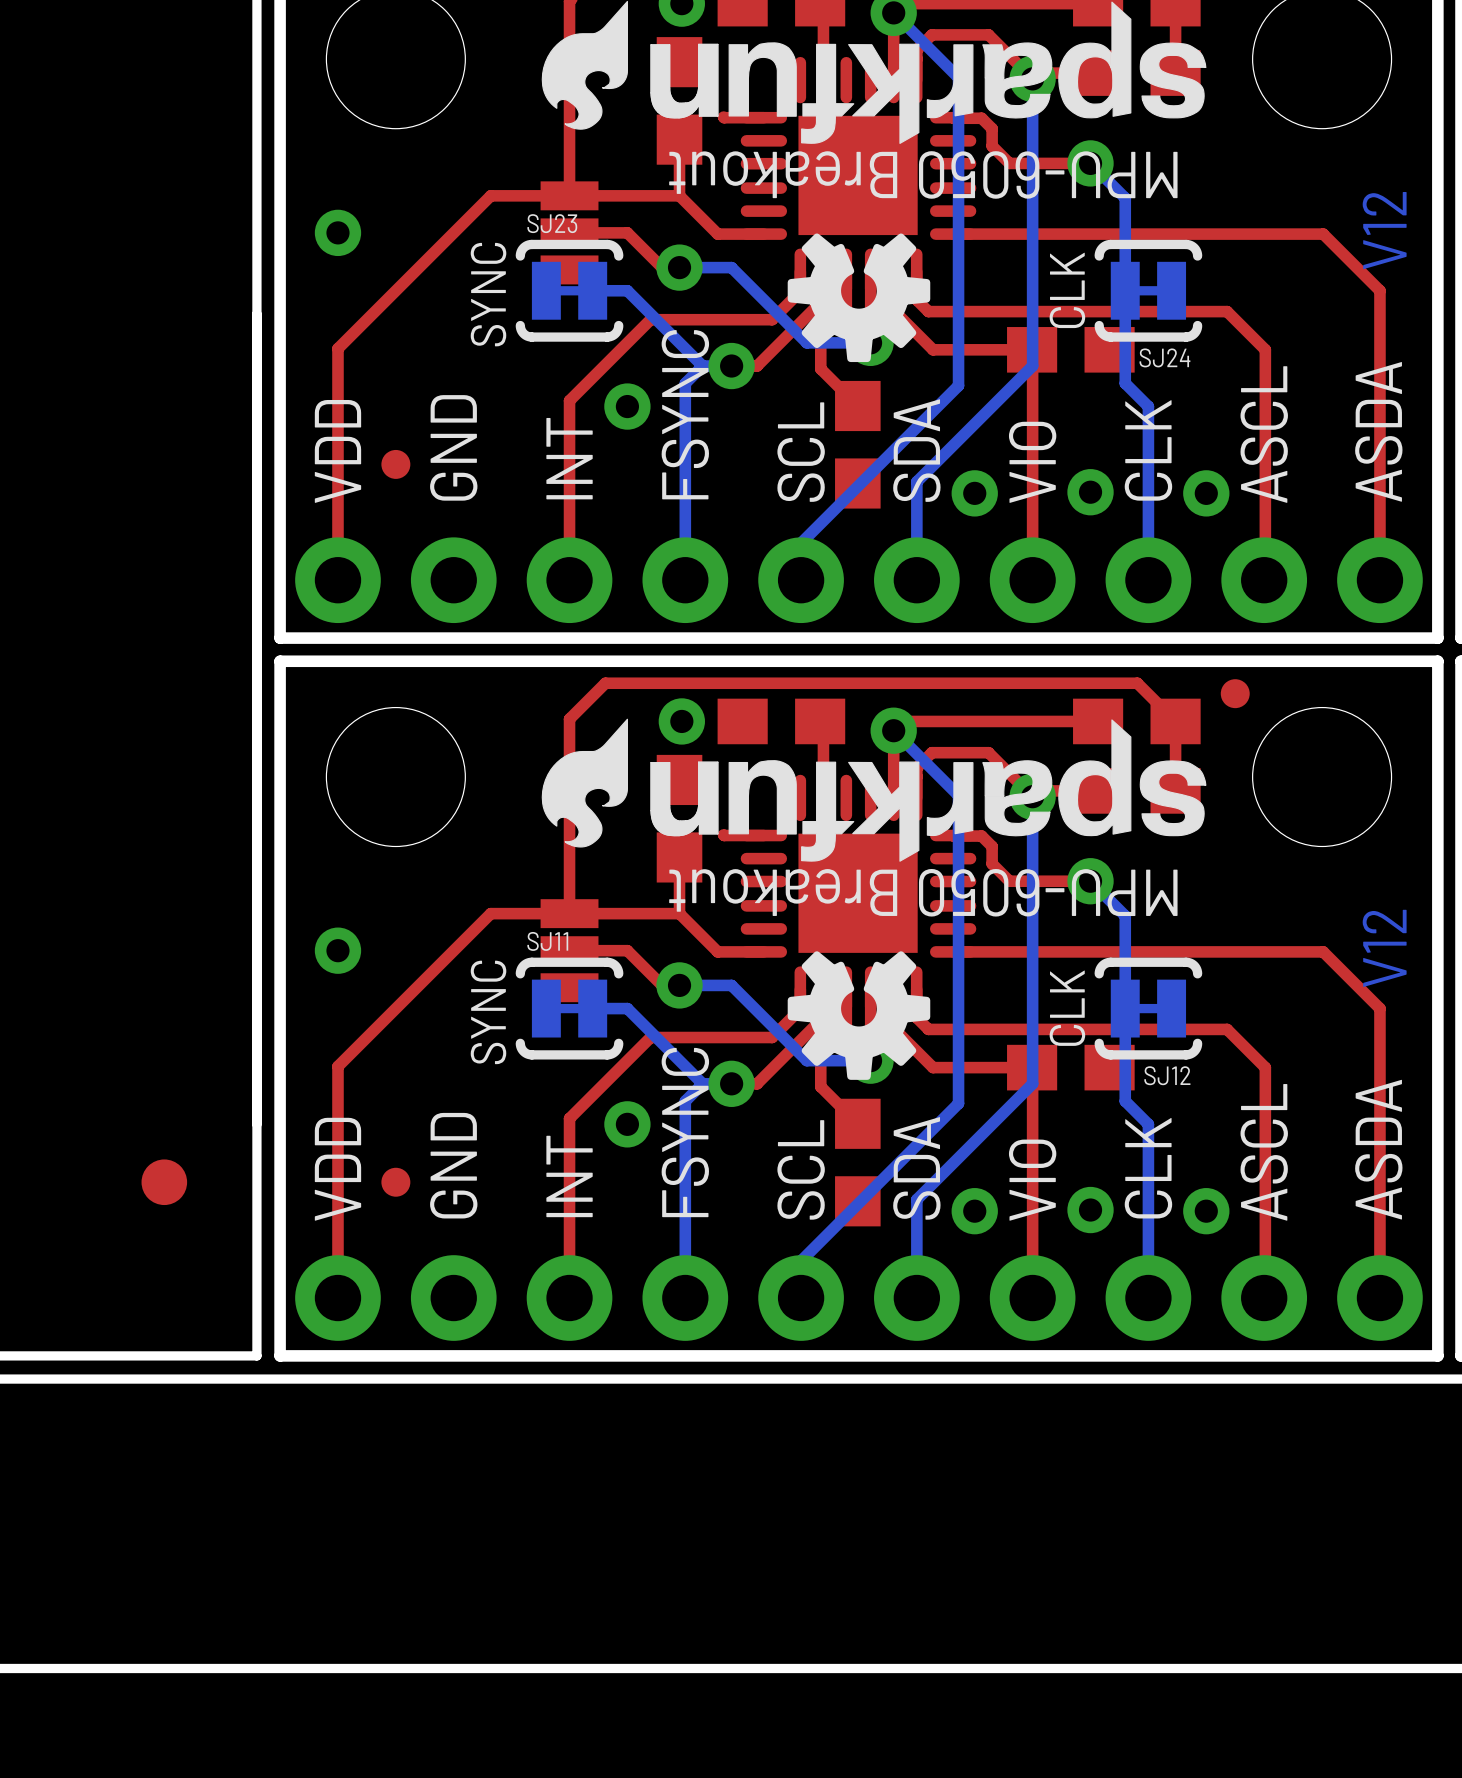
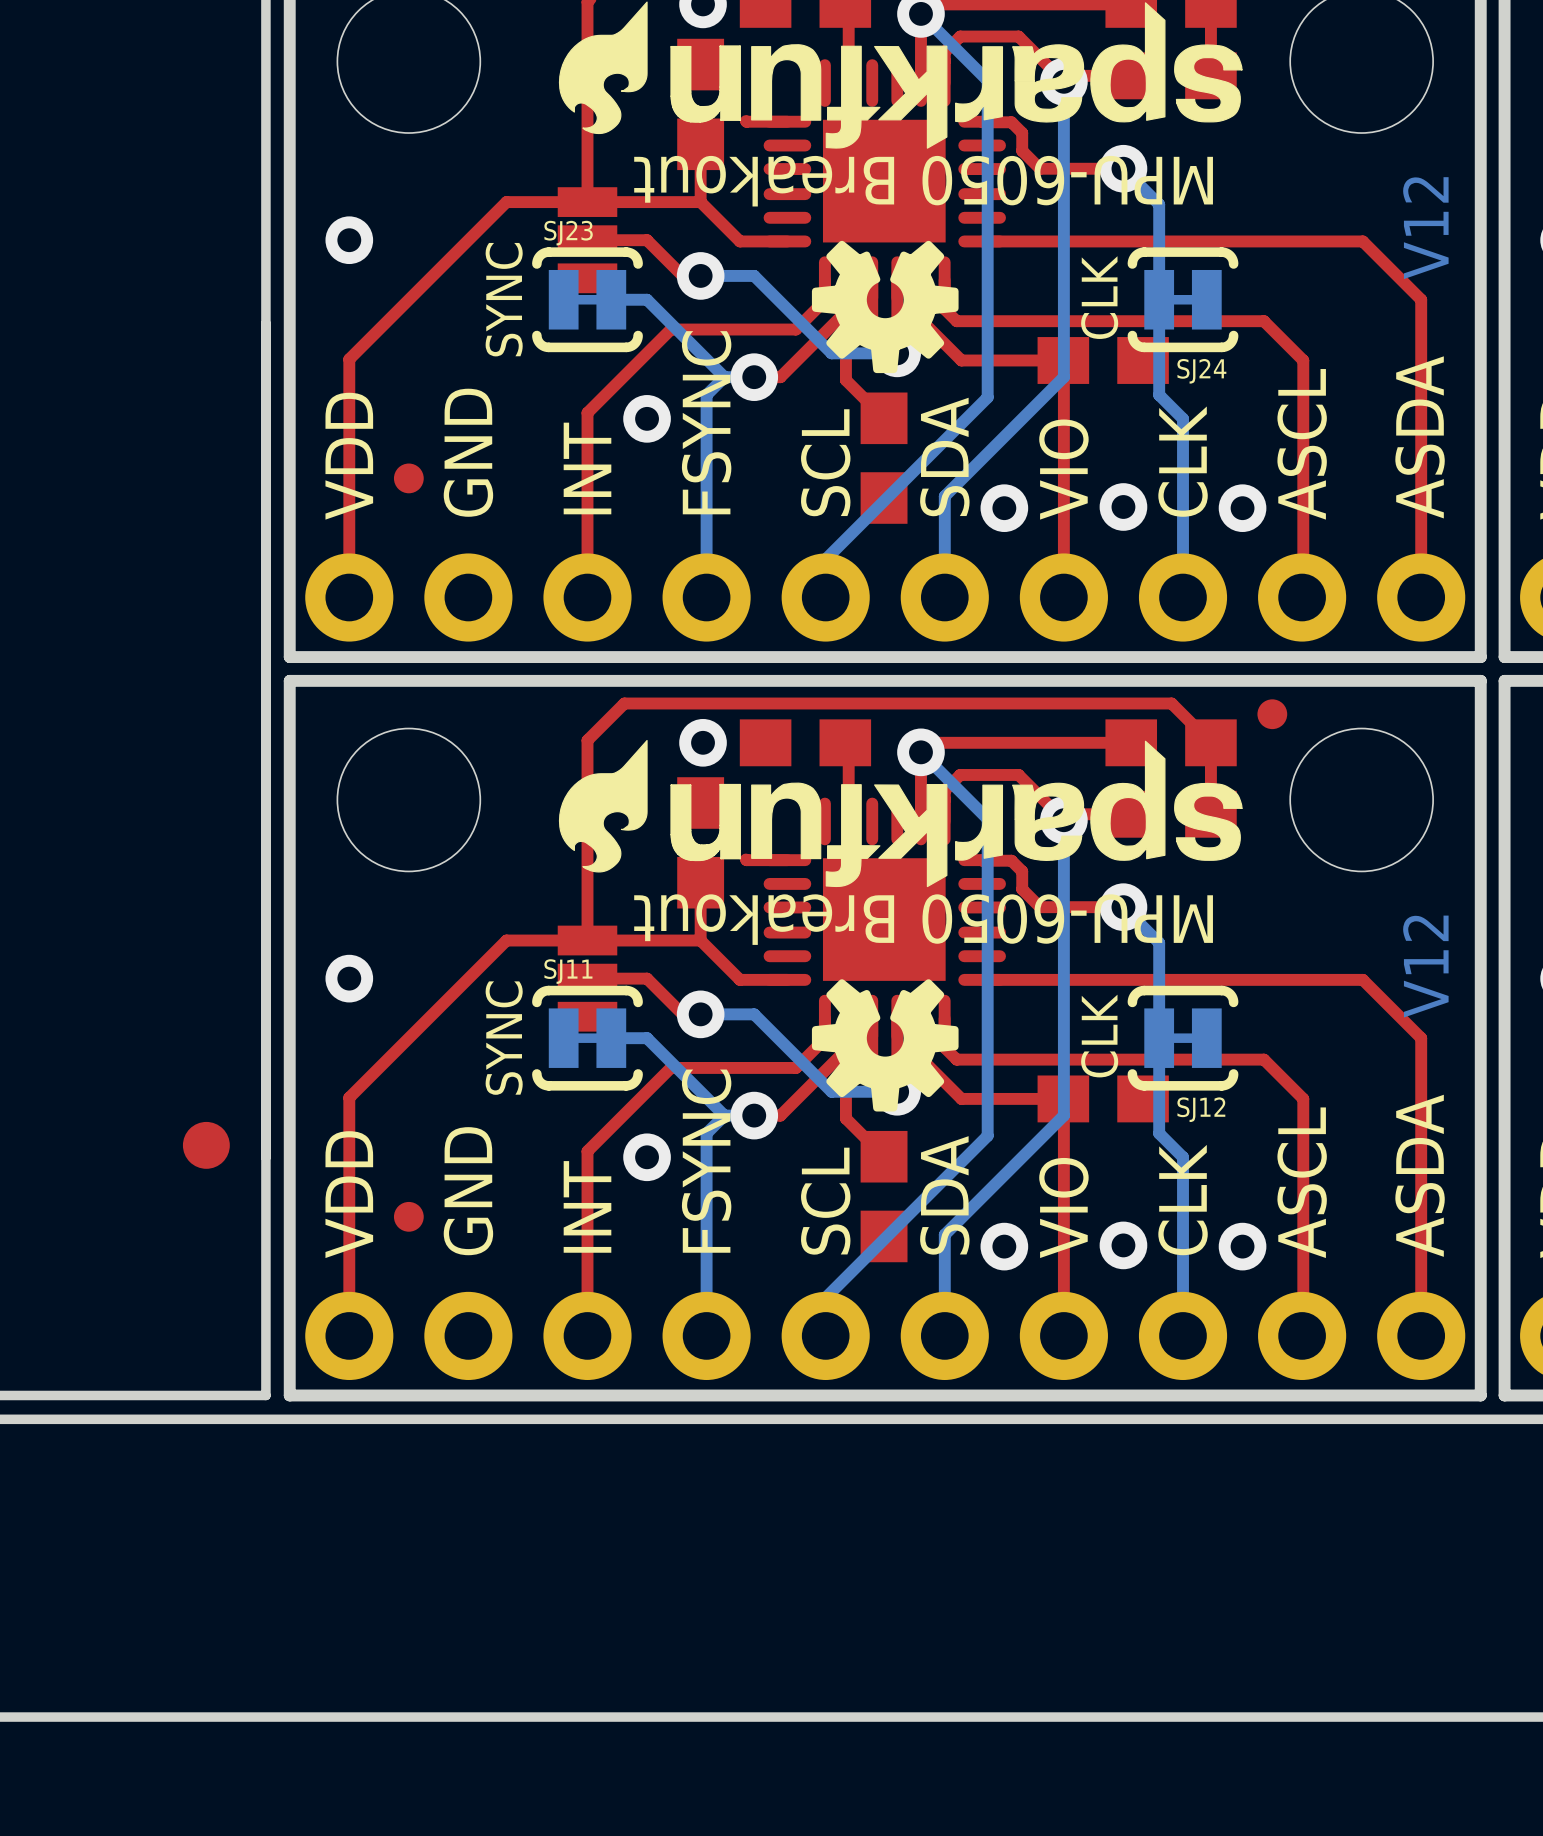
part position: (164, 1182) -> (206, 1145)

